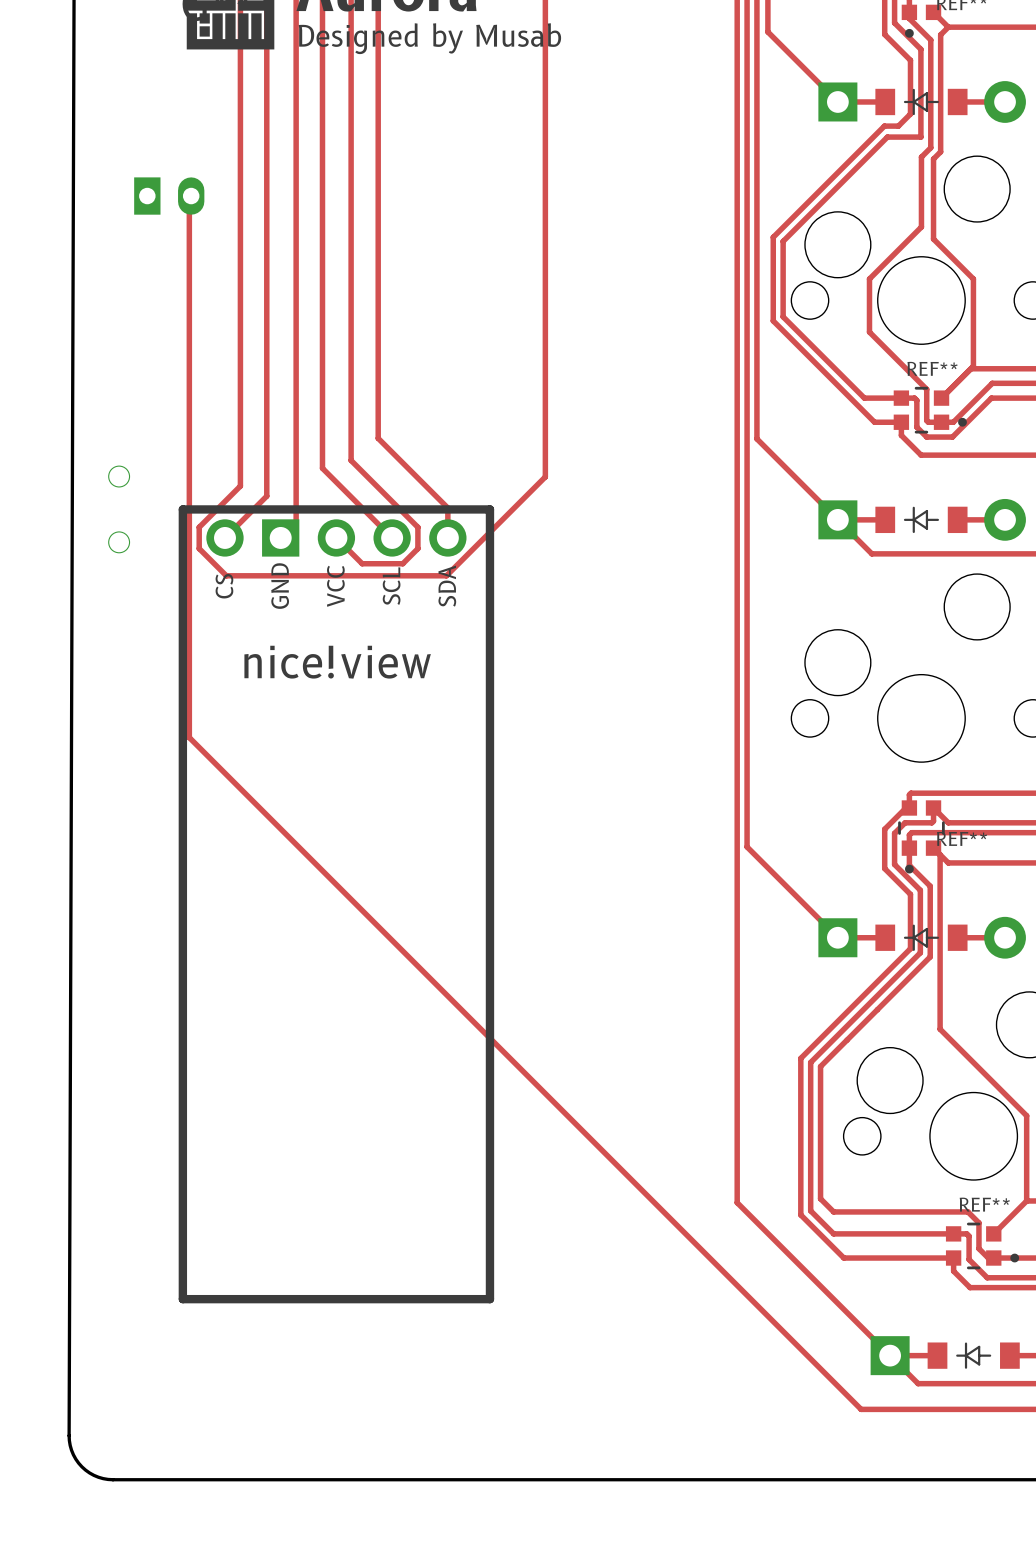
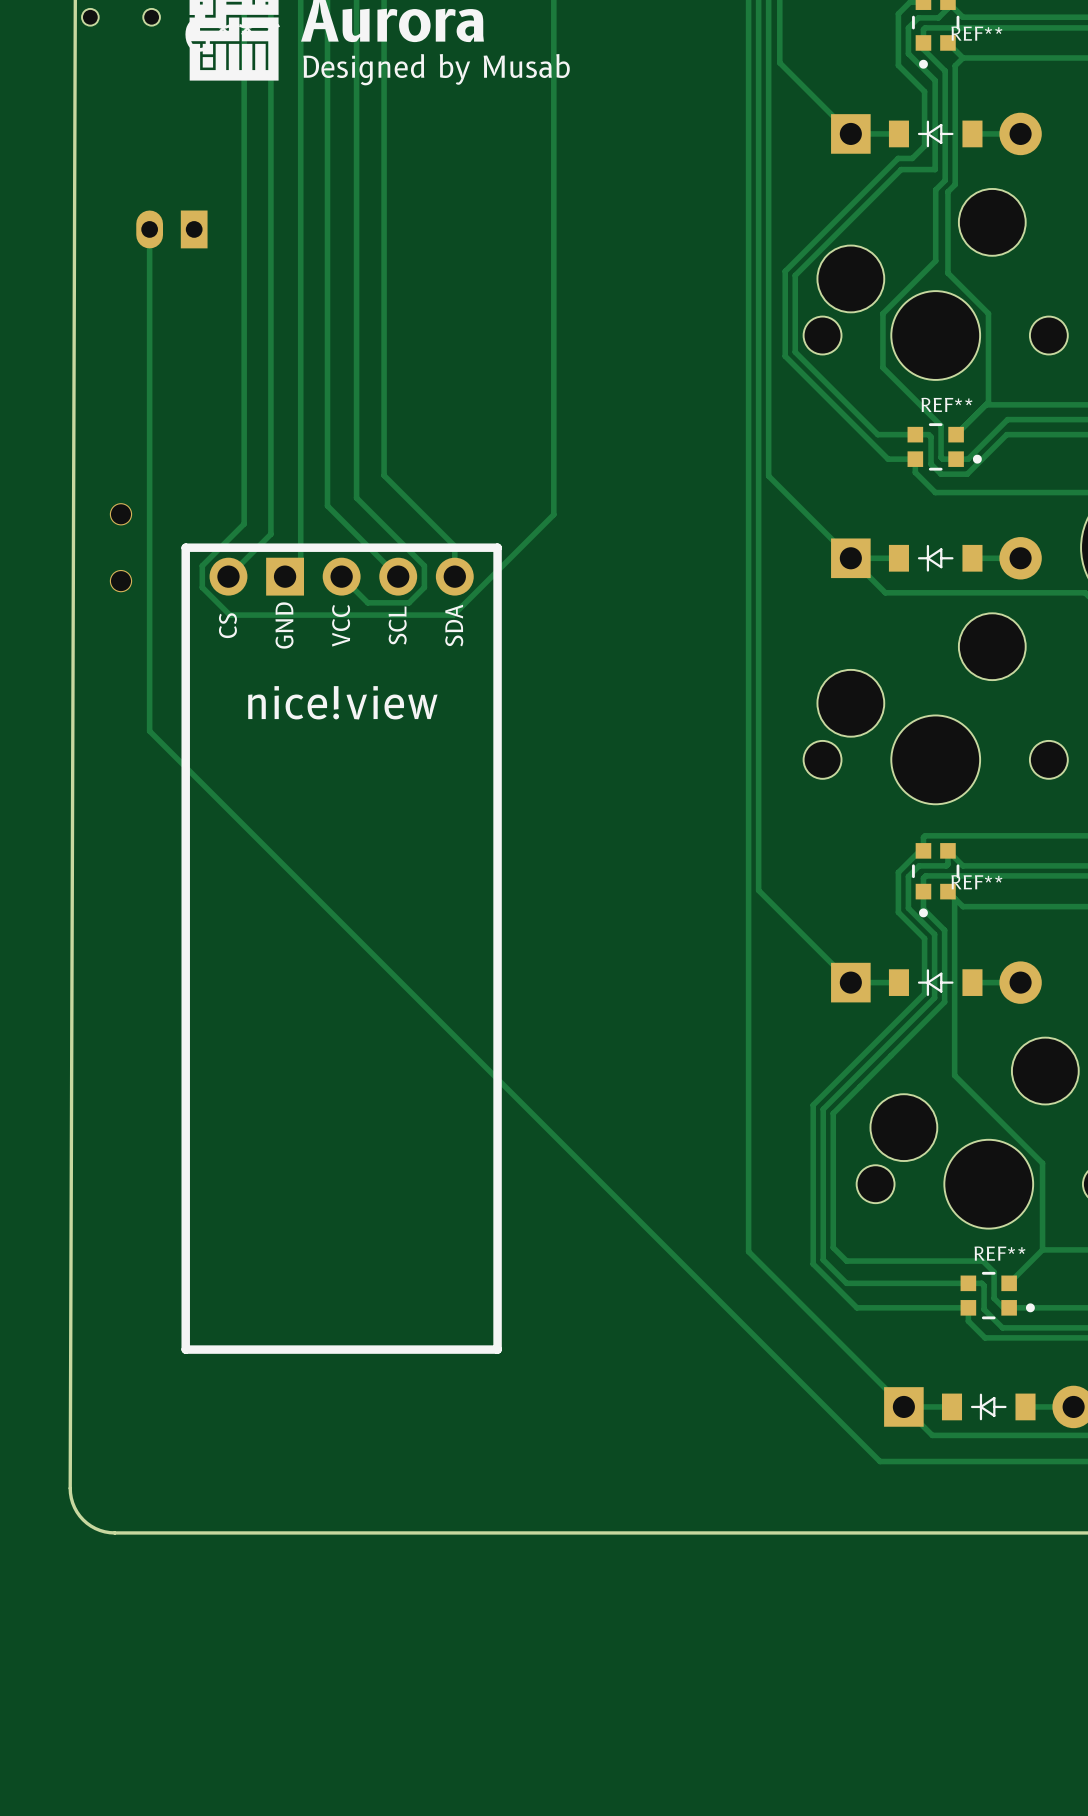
part rotation: 0° (169, 196) -> 180° (171, 229)
track: (189, 197) (189, 737) (861, 1409) (866, 1409) -> (149, 229) (149, 731) (880, 1461)

